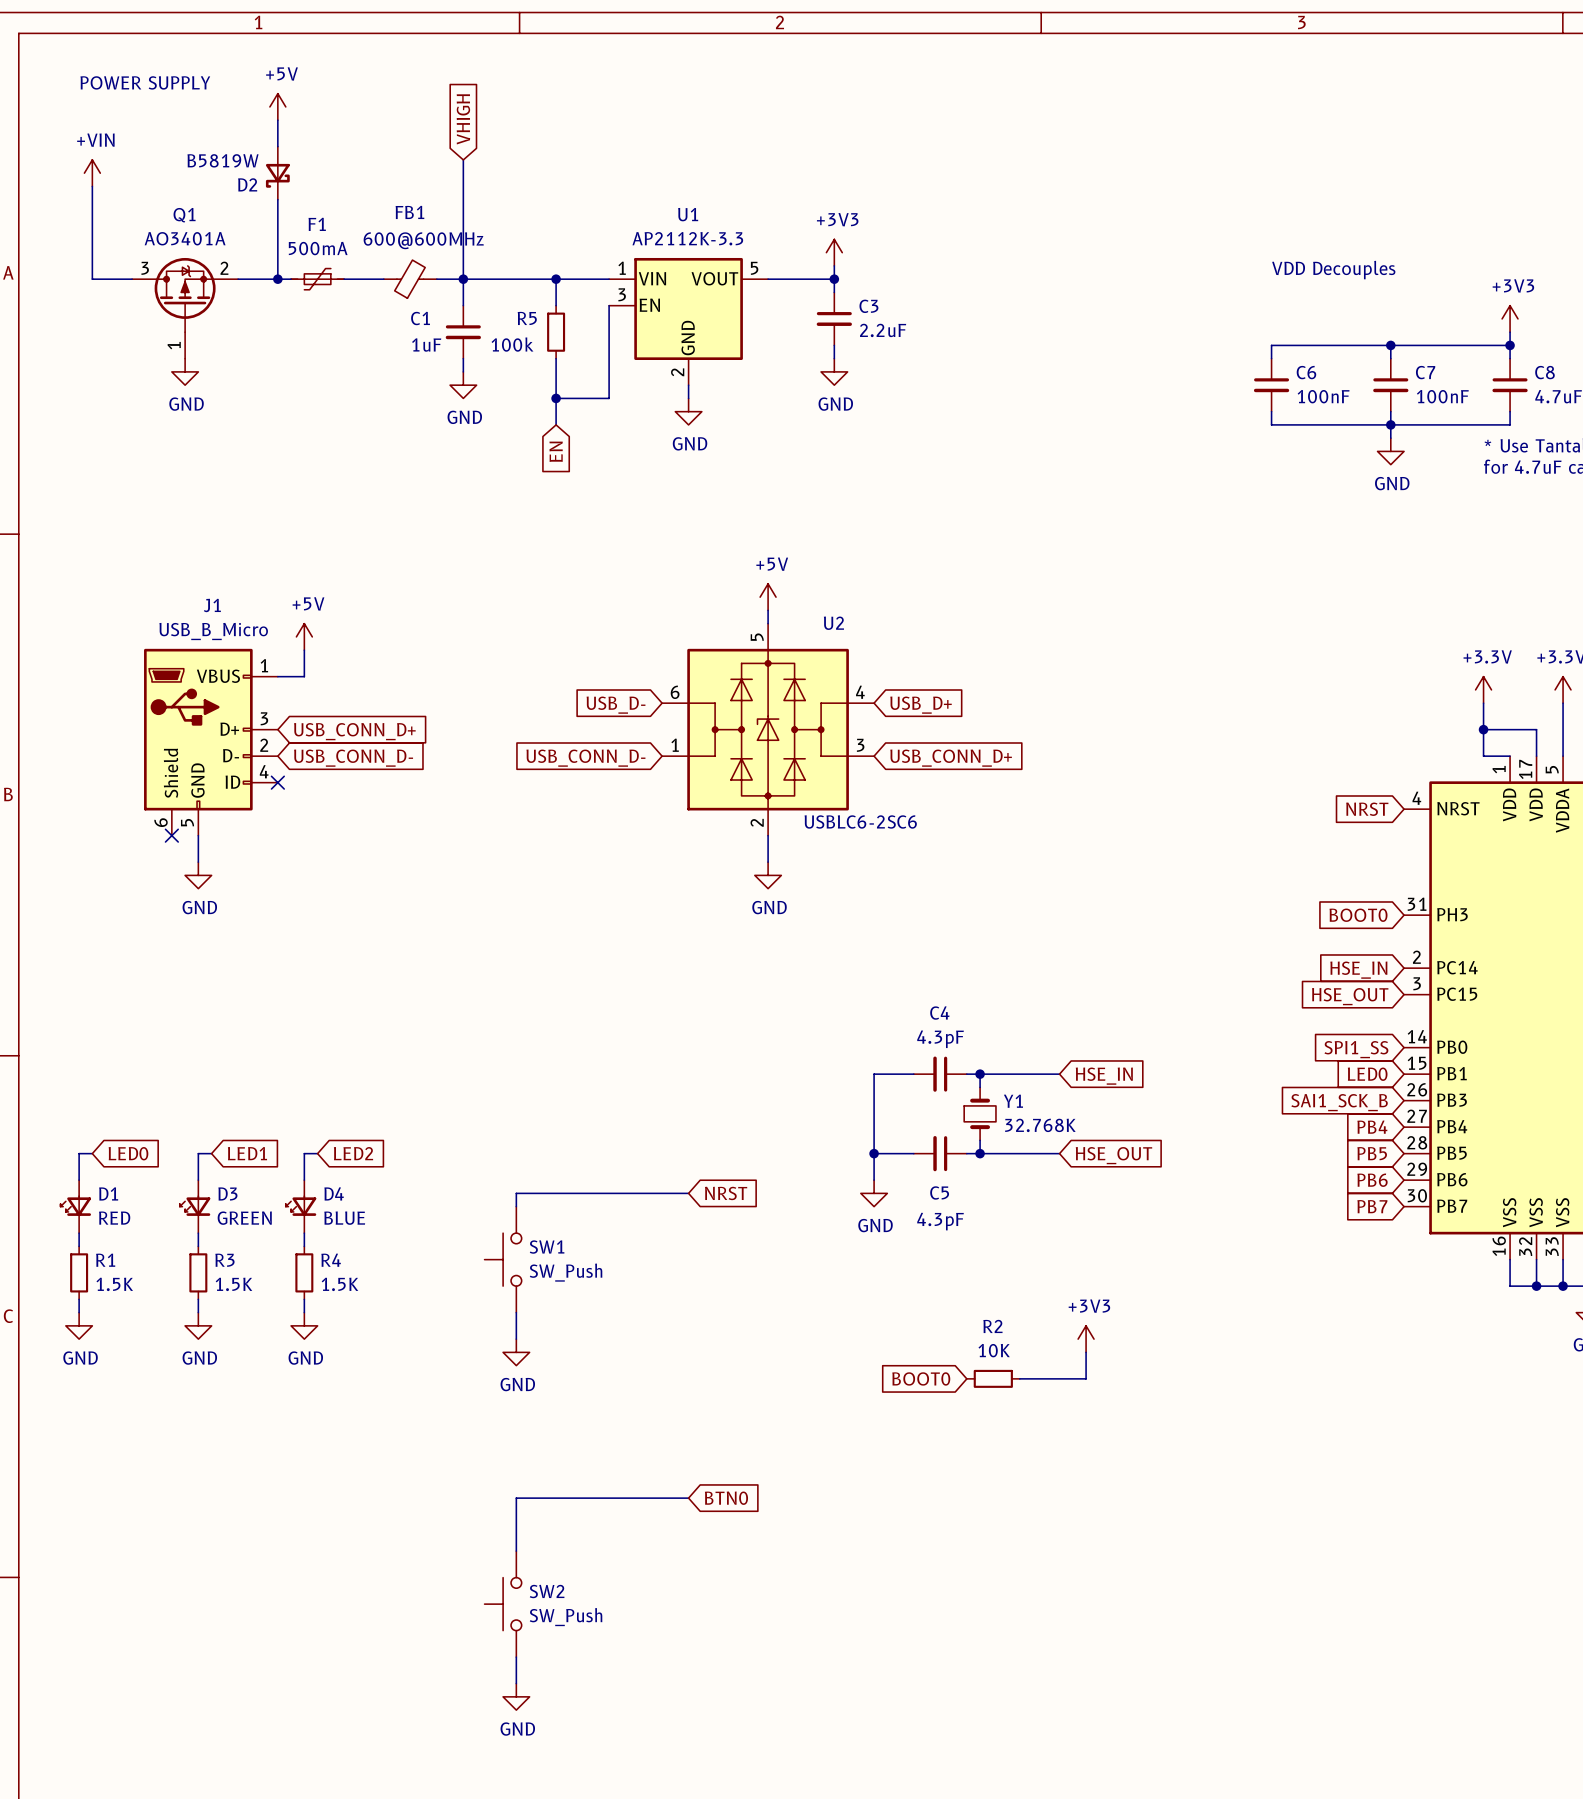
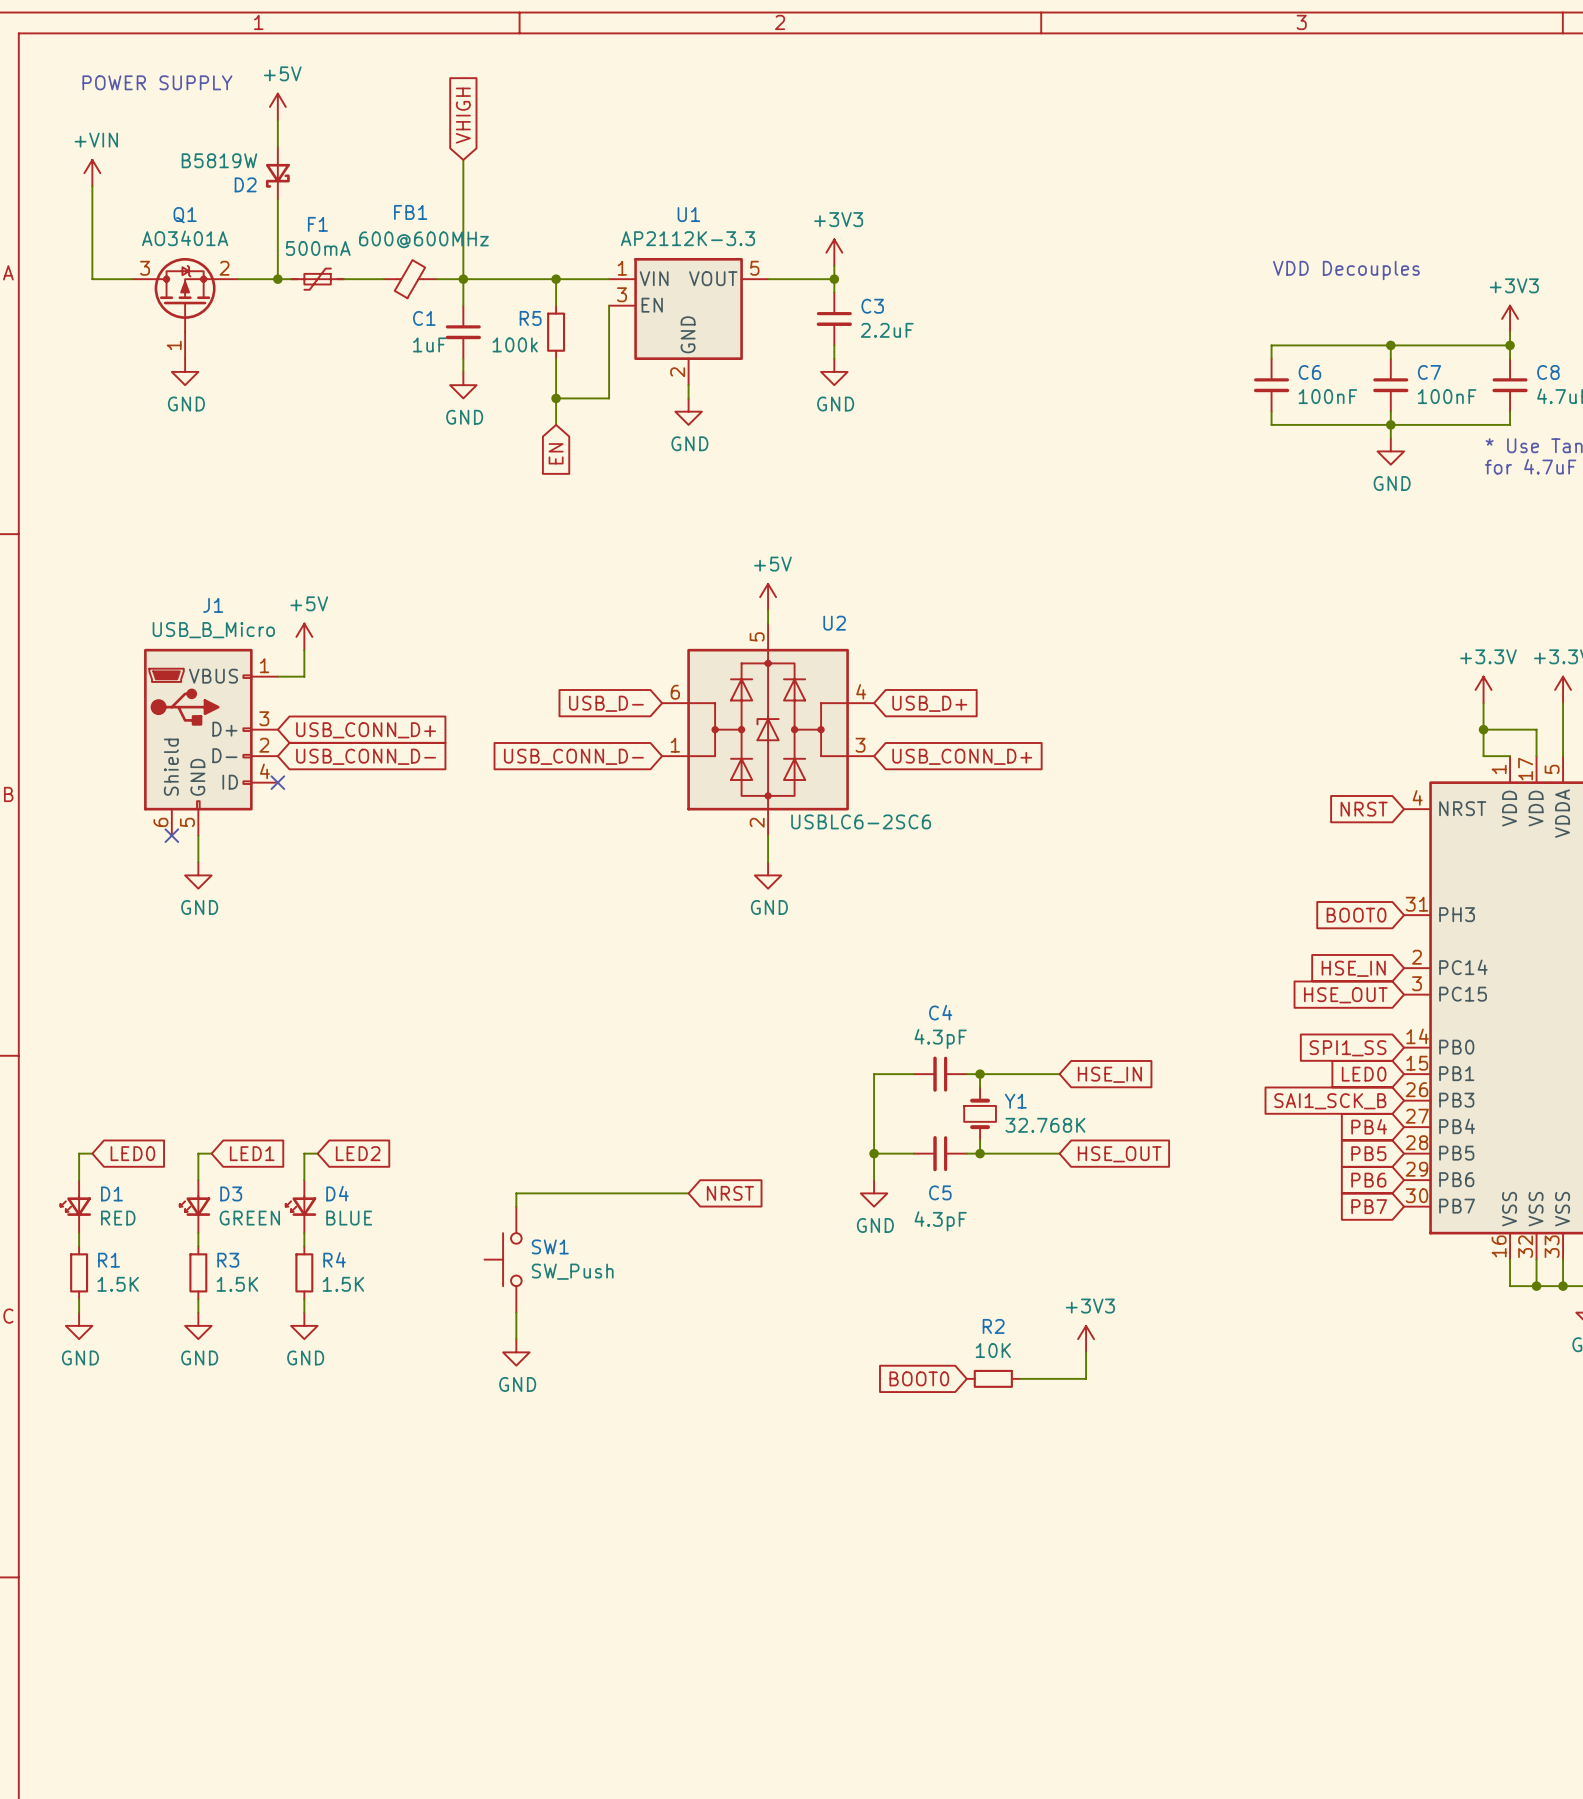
wire: (688, 1498) (516, 1498) (516, 1551) -> none
global label: BTN0 (726, 1498) -> none
SW2: SW_Push (503, 1604) -> none
wire: (516, 1657) (516, 1683) -> none
power symbol: GND (516, 1696) -> none

